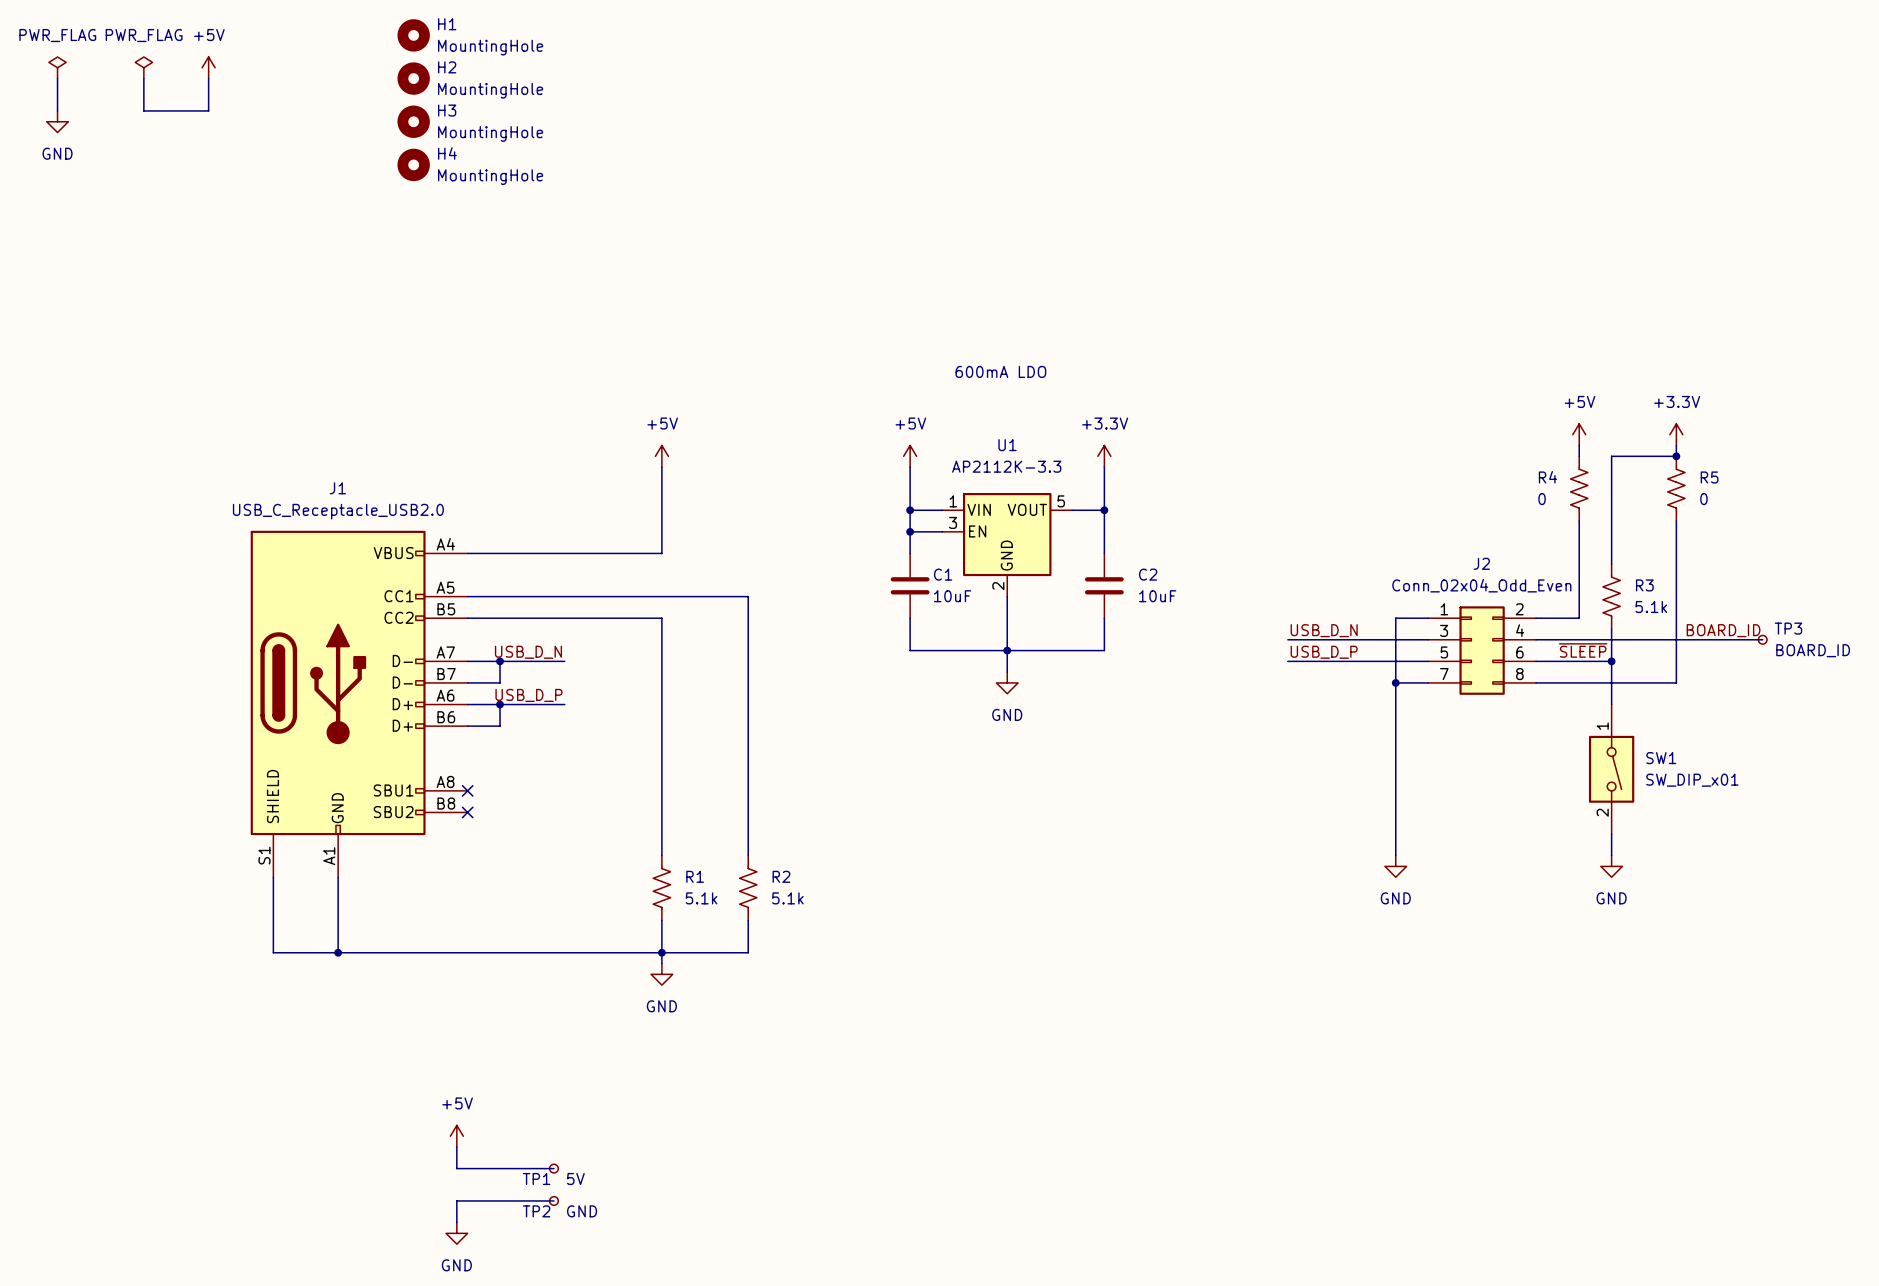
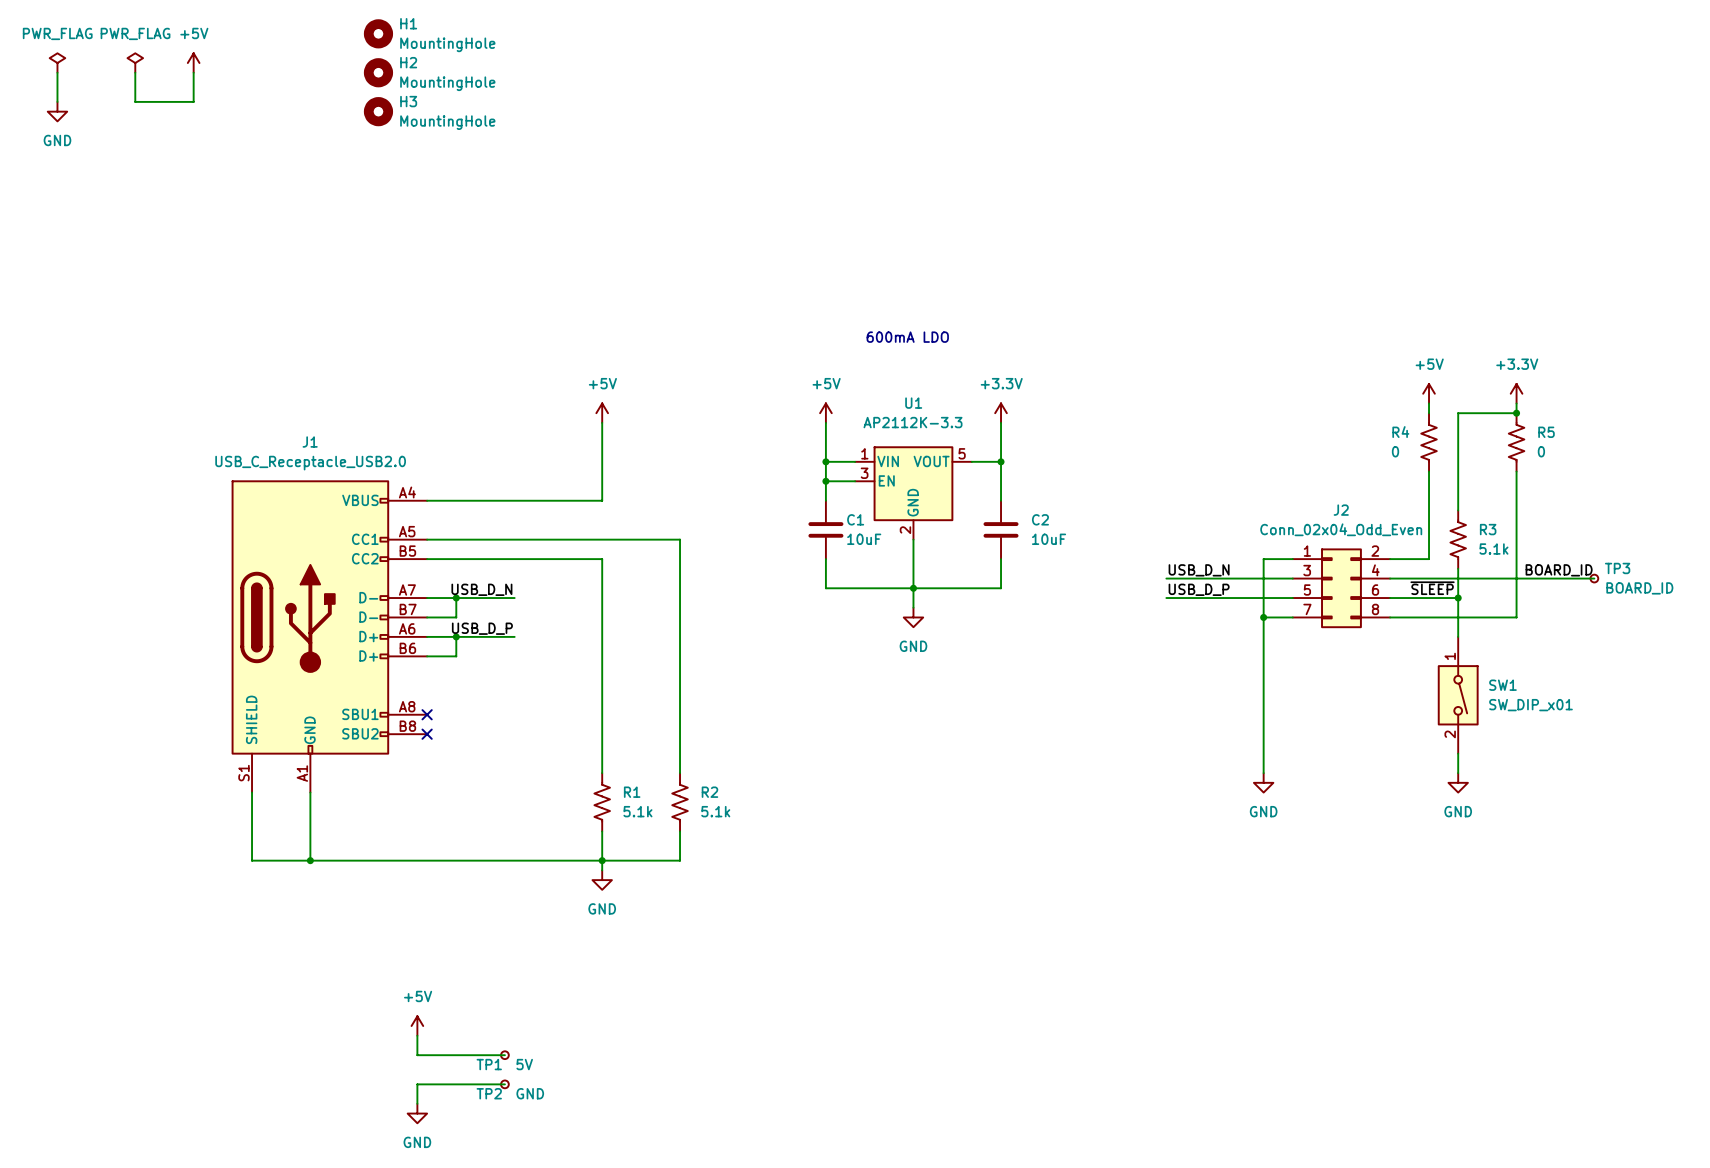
H4: MountingHole (413, 164) -> none

